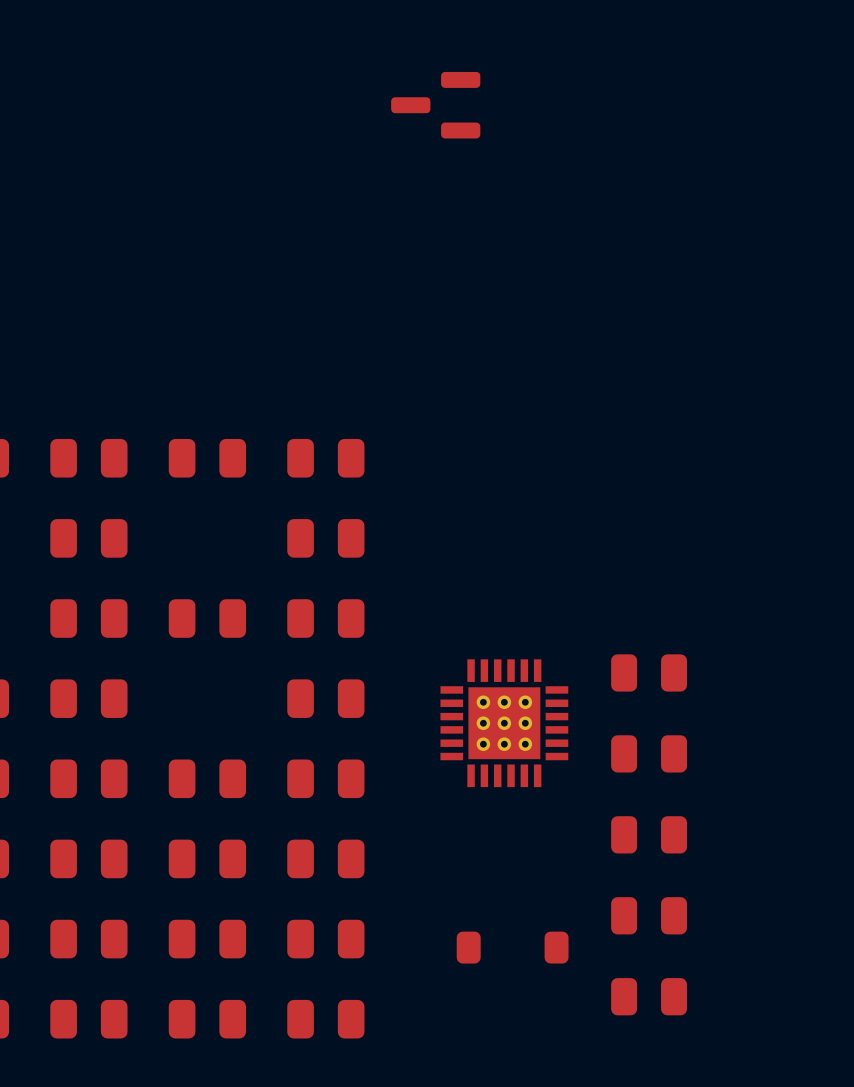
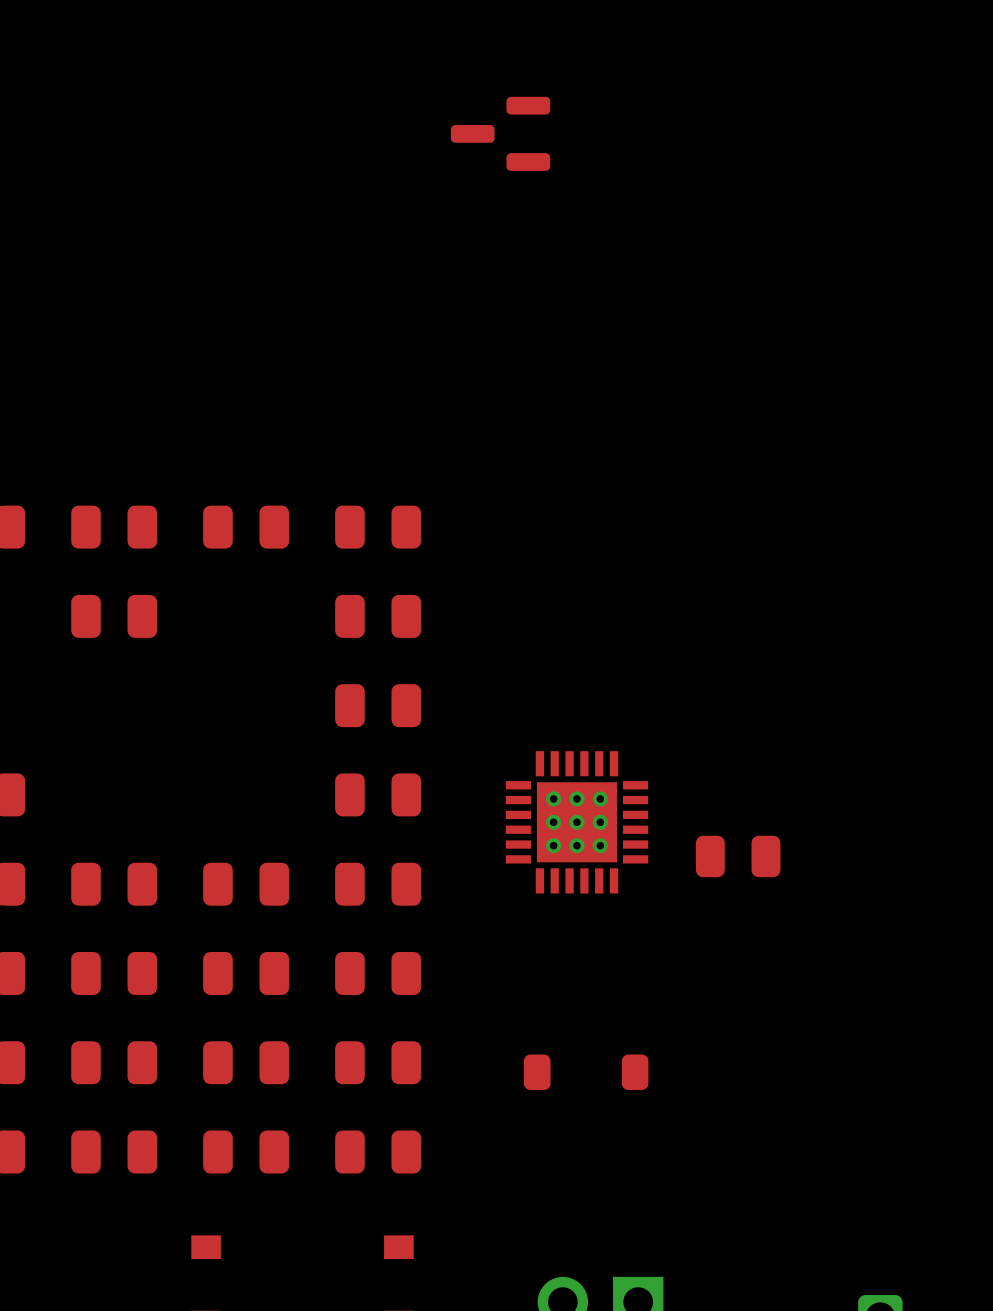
part: (88, 618) -> none
part: (207, 618) -> none
part: (649, 672) -> none
part: (88, 698) -> none
part: (649, 834) -> none
part: (649, 915) -> none
part: (649, 996) -> none

